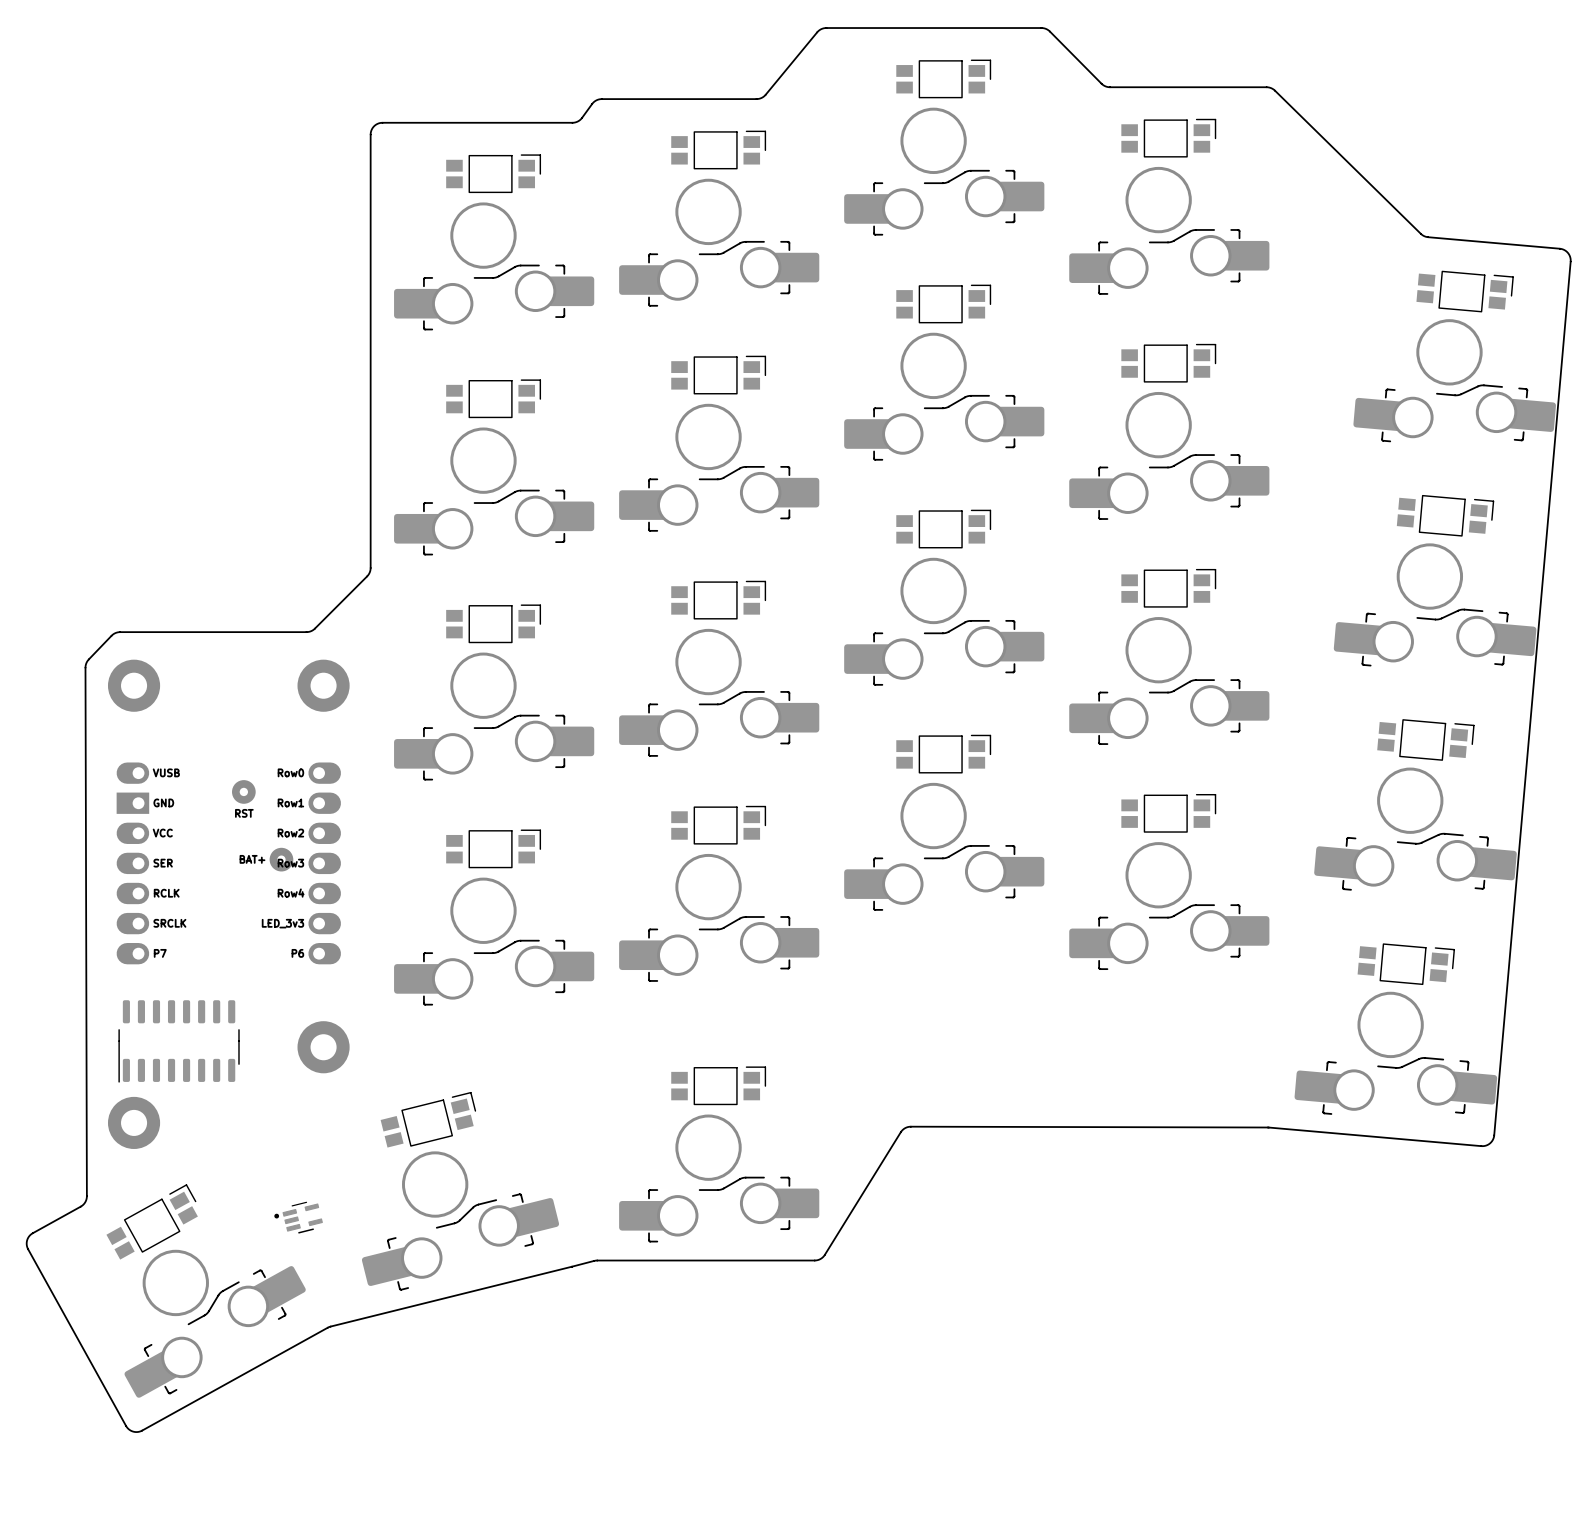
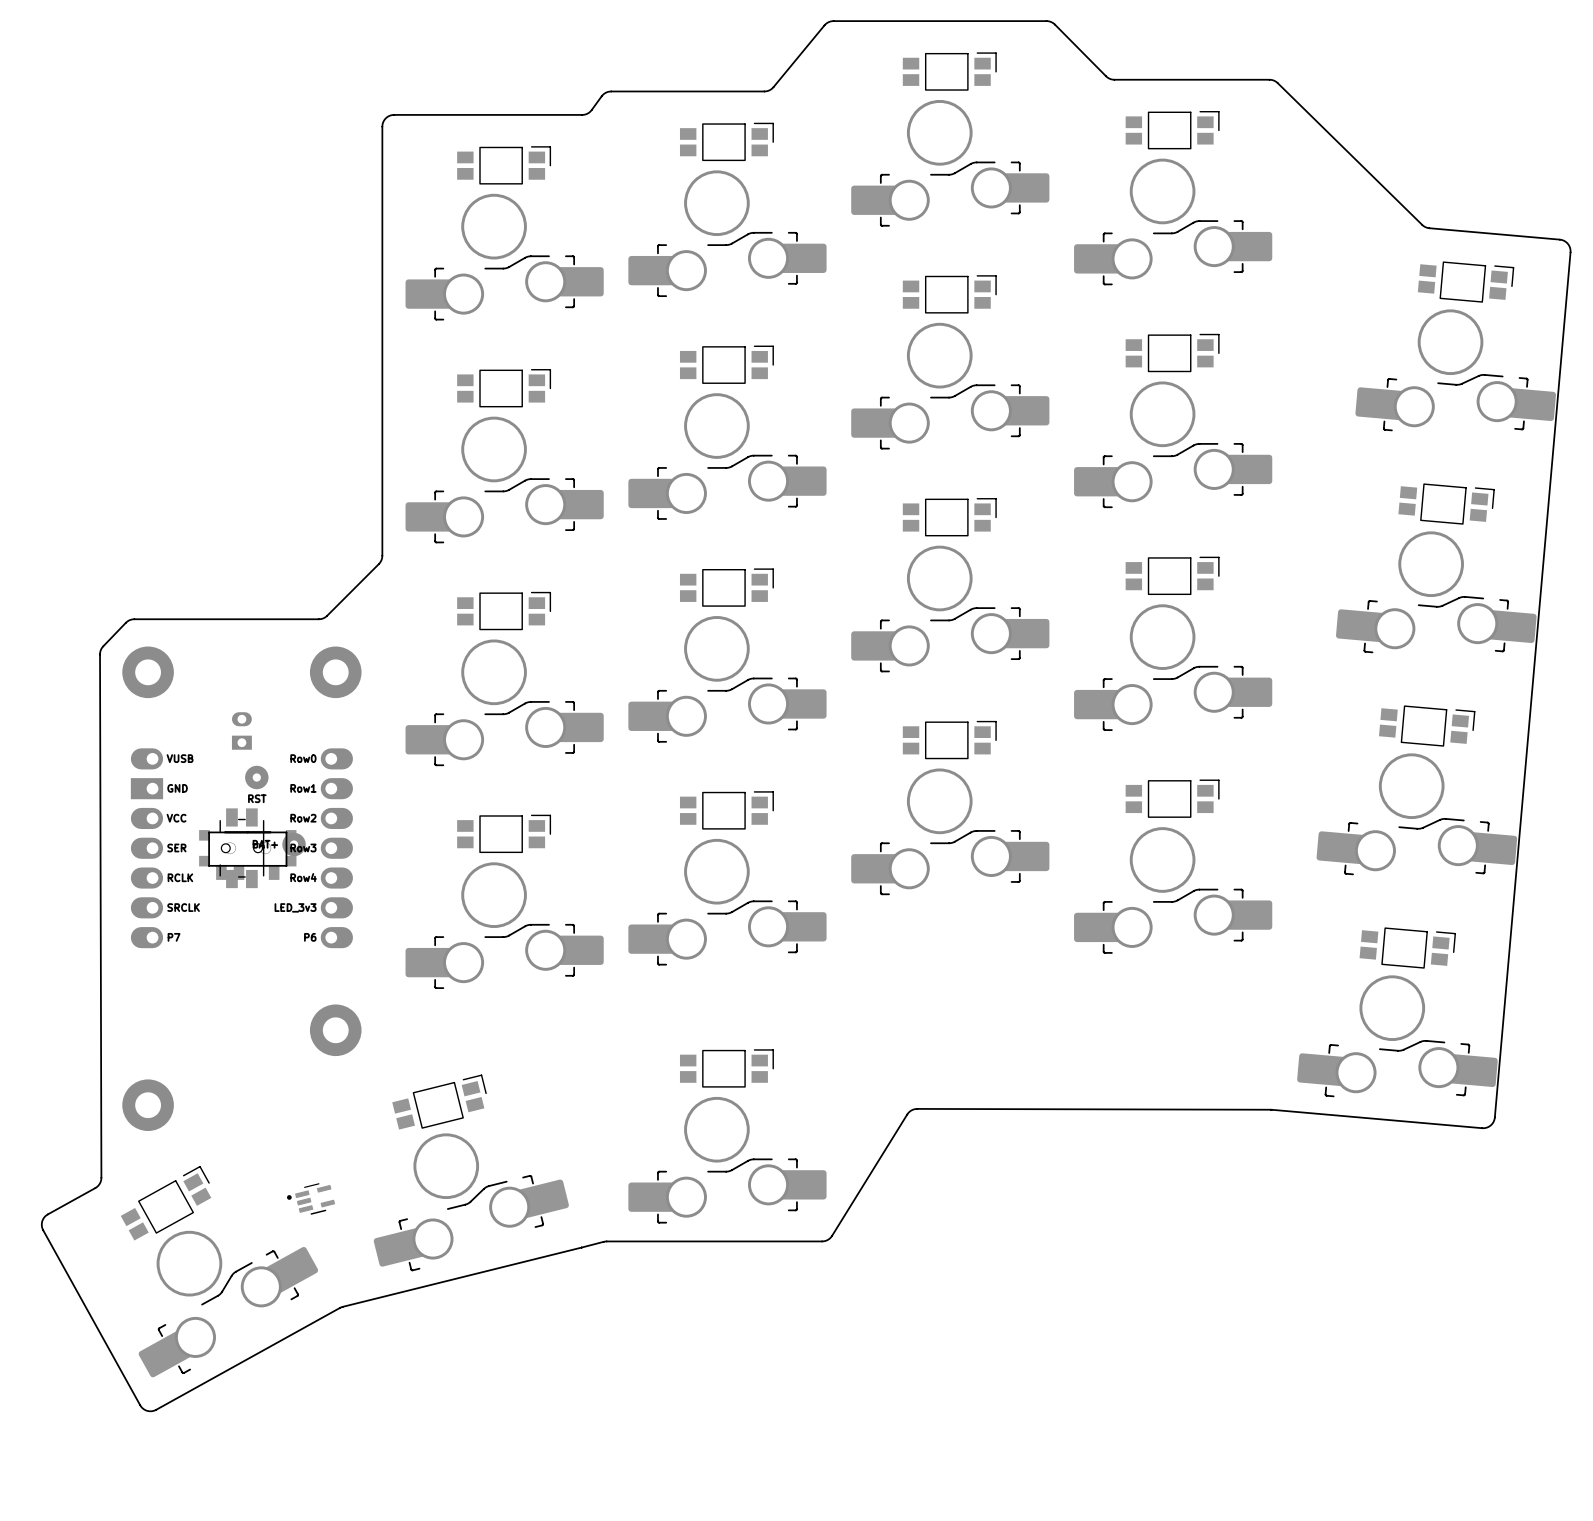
part: none -> (241, 730)
part: none -> (241, 848)
part: none -> (247, 854)
part: (179, 1041) -> none

